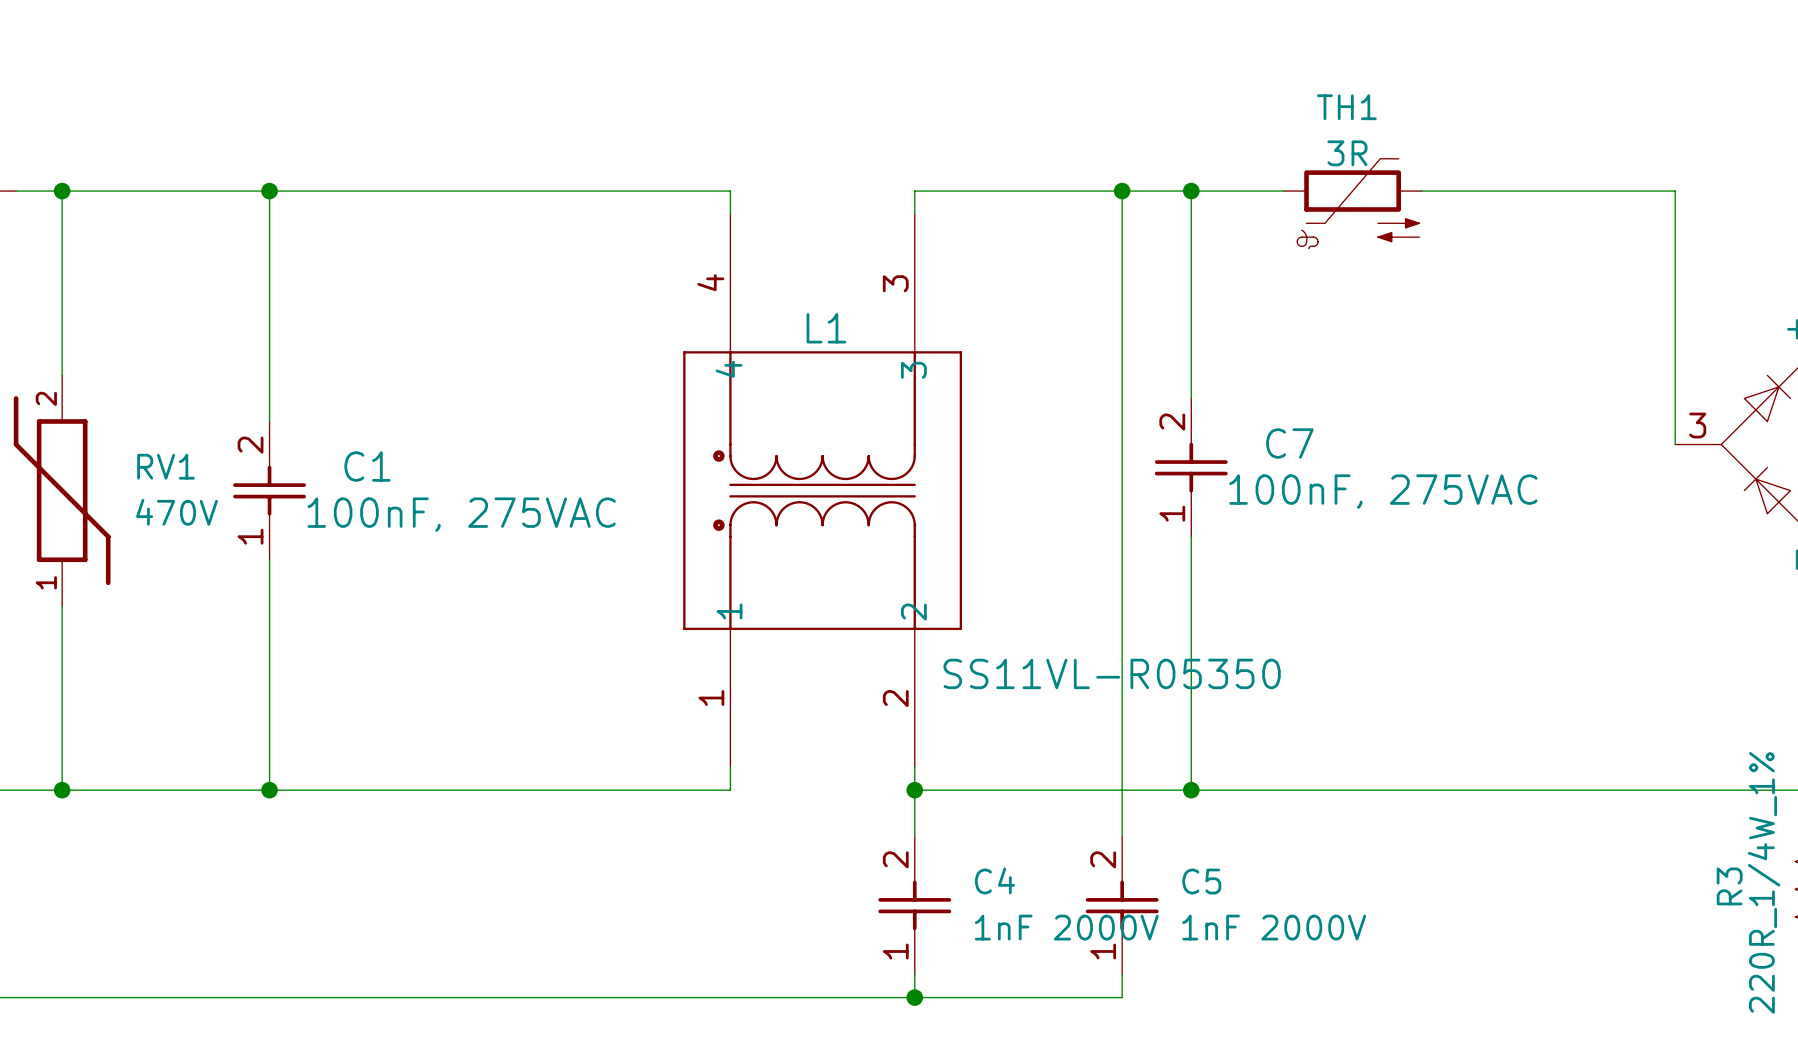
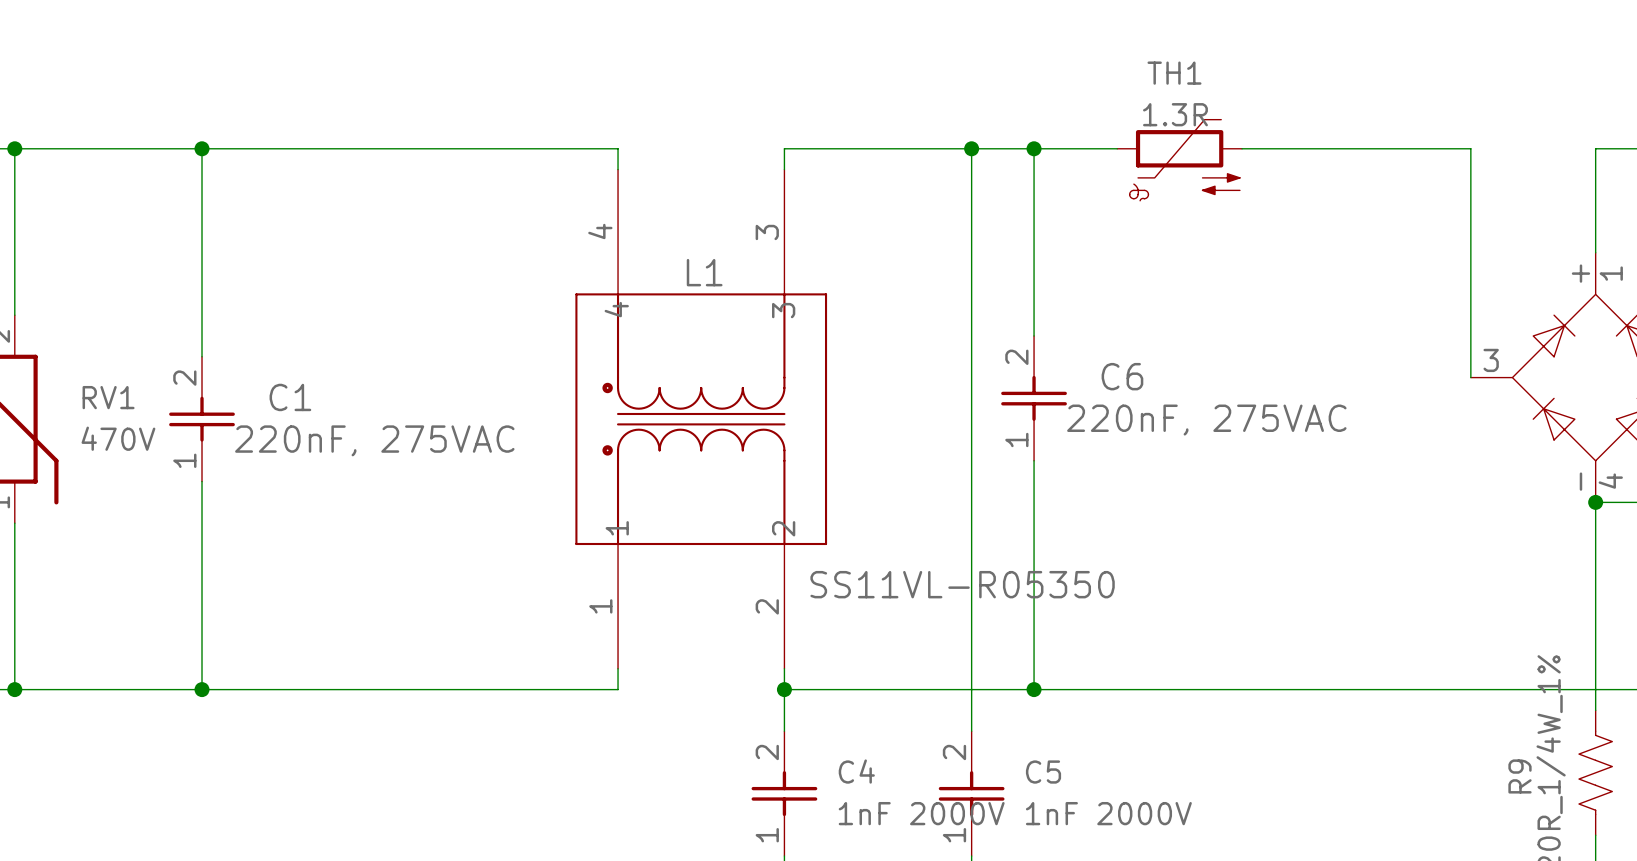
TH1 value: 3R (1347, 153) -> 1.3R (1175, 114)
C7 name: C7 (1289, 443) -> C6 (1122, 376)
C7 value: 100nF, 275VAC (1383, 491) -> 220nF, 275VAC (1206, 420)
C1 value: 100nF, 275VAC (461, 514) -> 220nF, 275VAC (374, 440)
R3 name: R3 (1729, 886) -> R9 (1520, 776)

